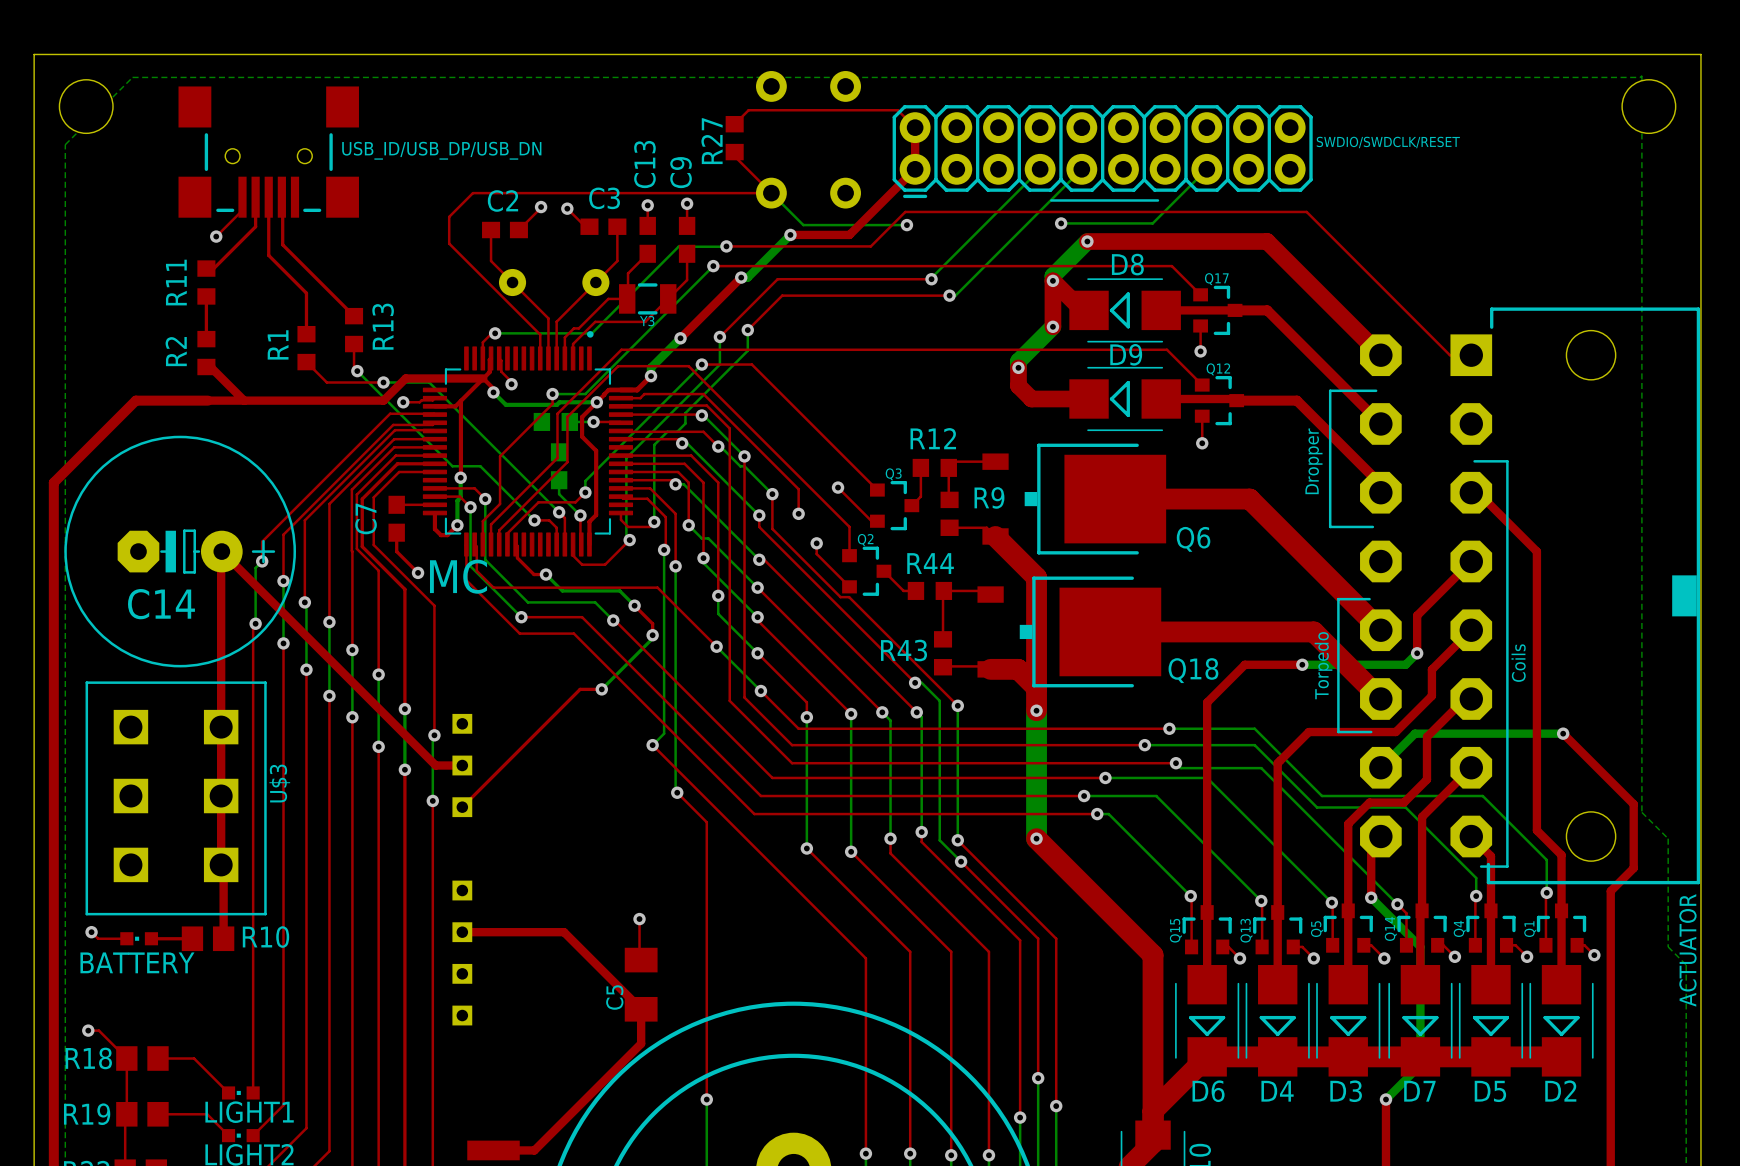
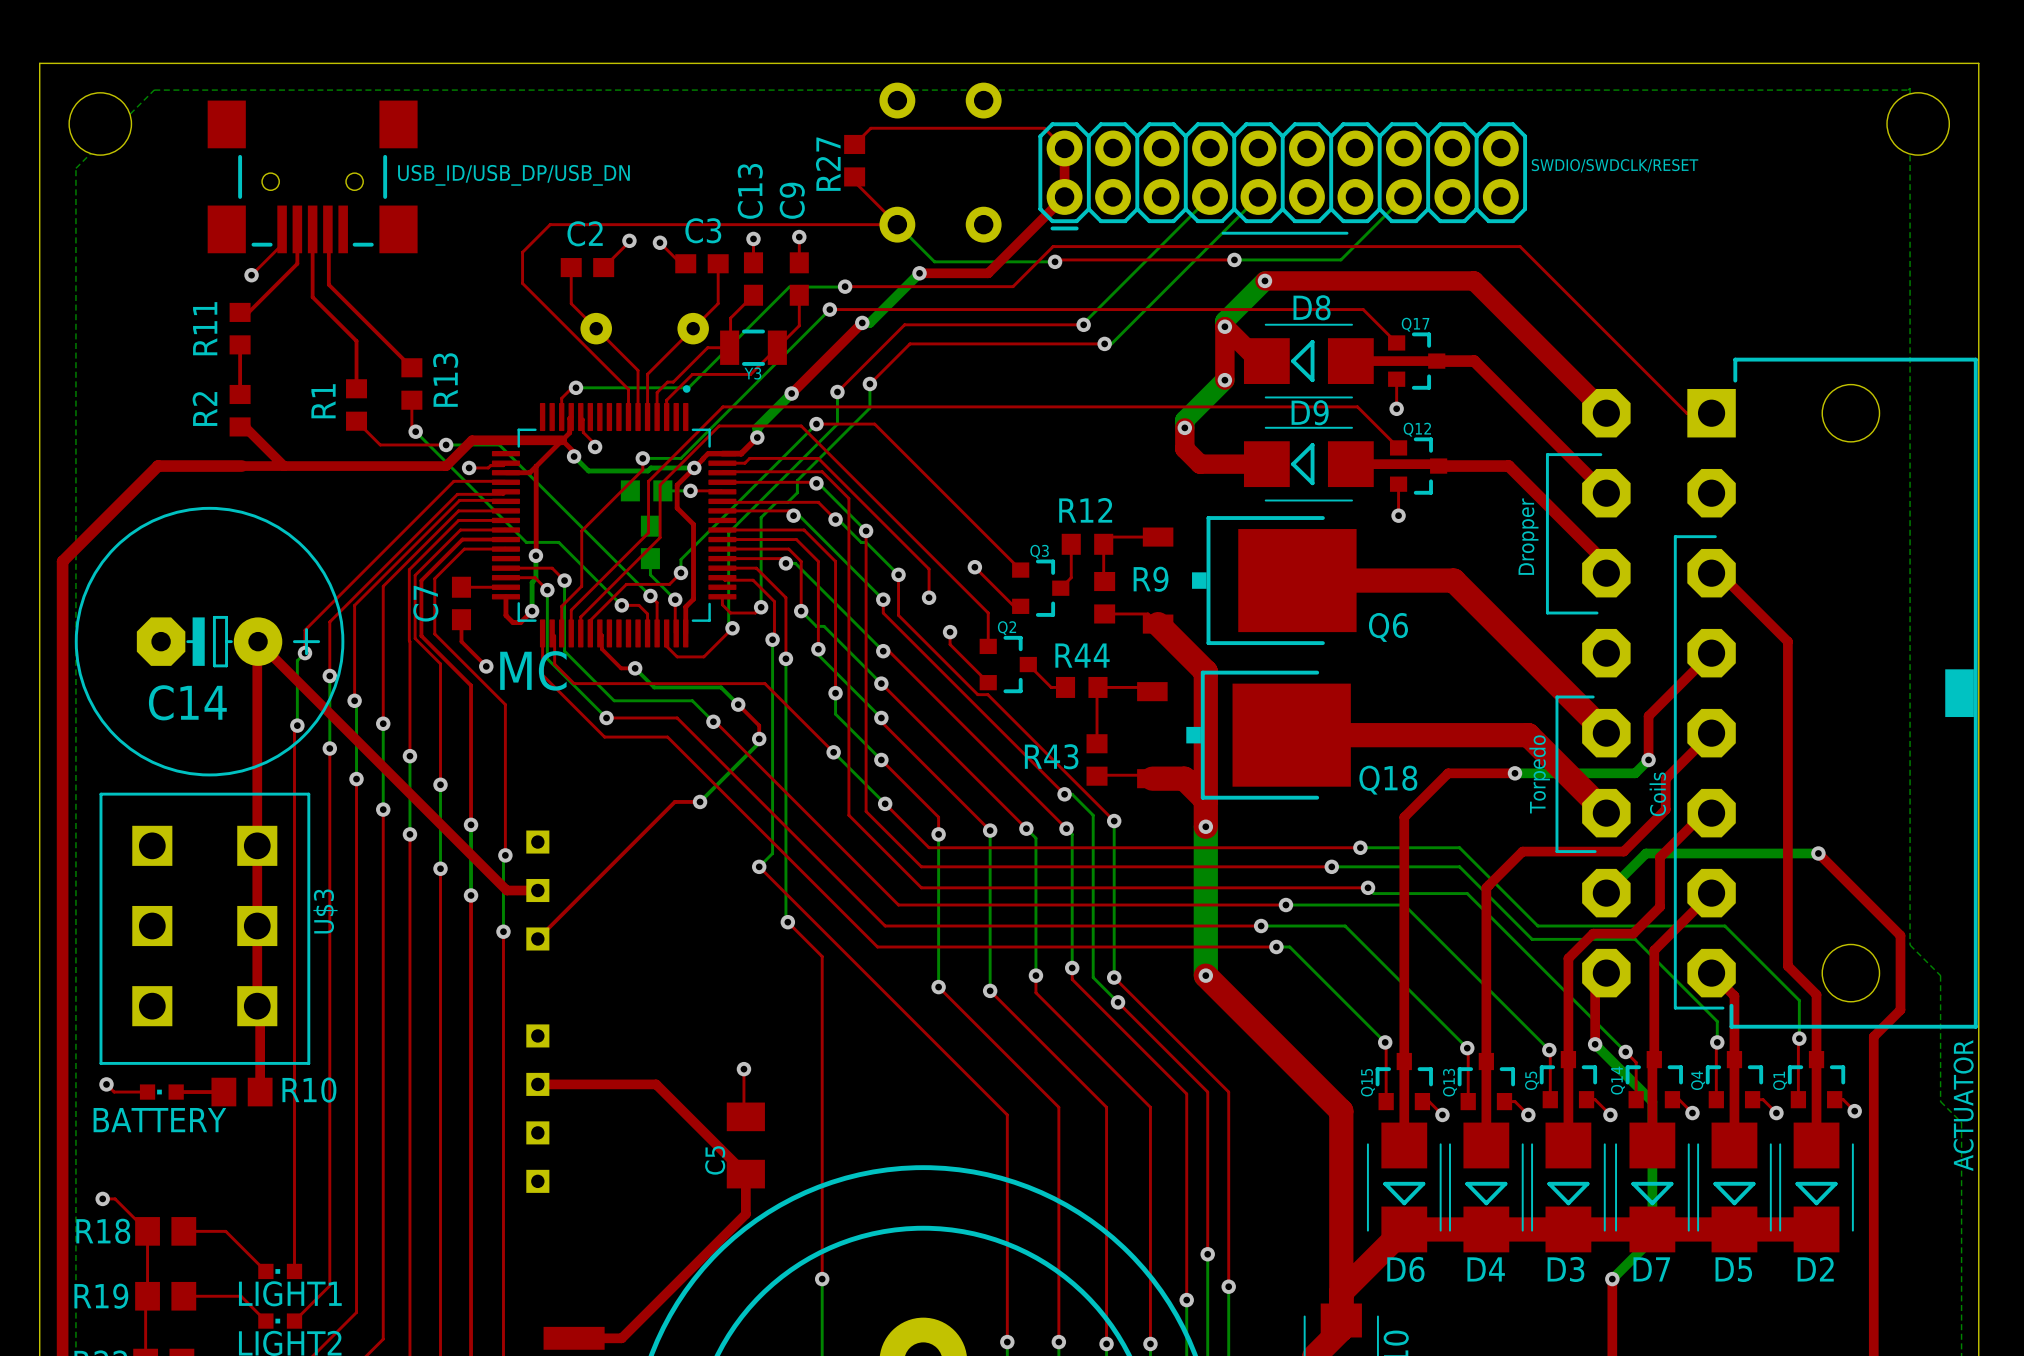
top track: none -> (1234, 259) (1056, 259) (1055, 261)
line: (1474, 461) (1507, 461) (1507, 866) (1481, 866) -> (1715, 536) (1675, 536) (1675, 1008) (1723, 1008)
text position: Coils (1518, 663) -> Coils (1657, 794)

